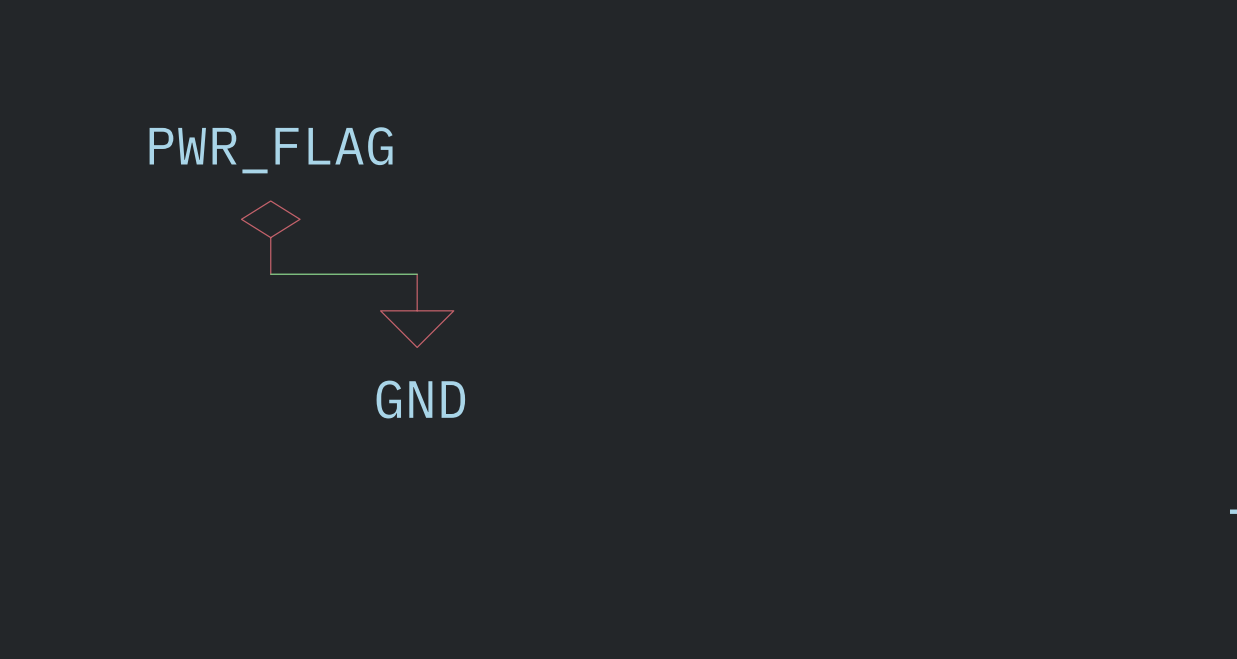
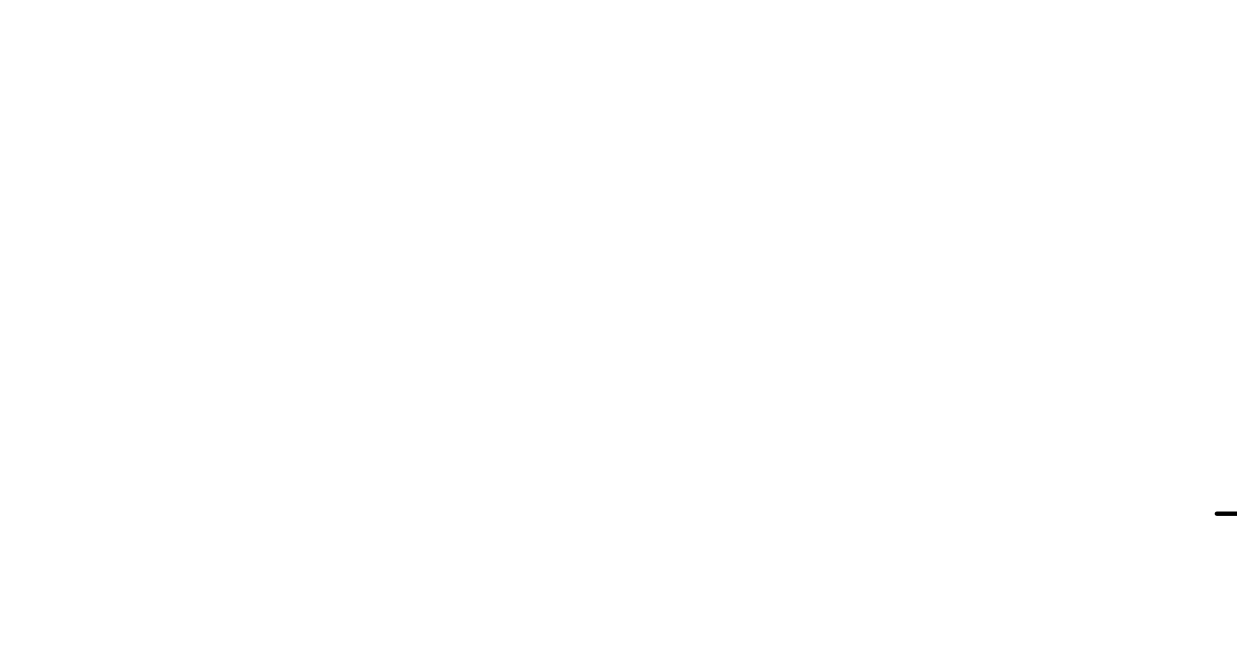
power symbol: PWR_FLAG (270, 237) -> none
wire: (270, 274) (417, 274) -> none
power symbol: GND (417, 310) -> none

